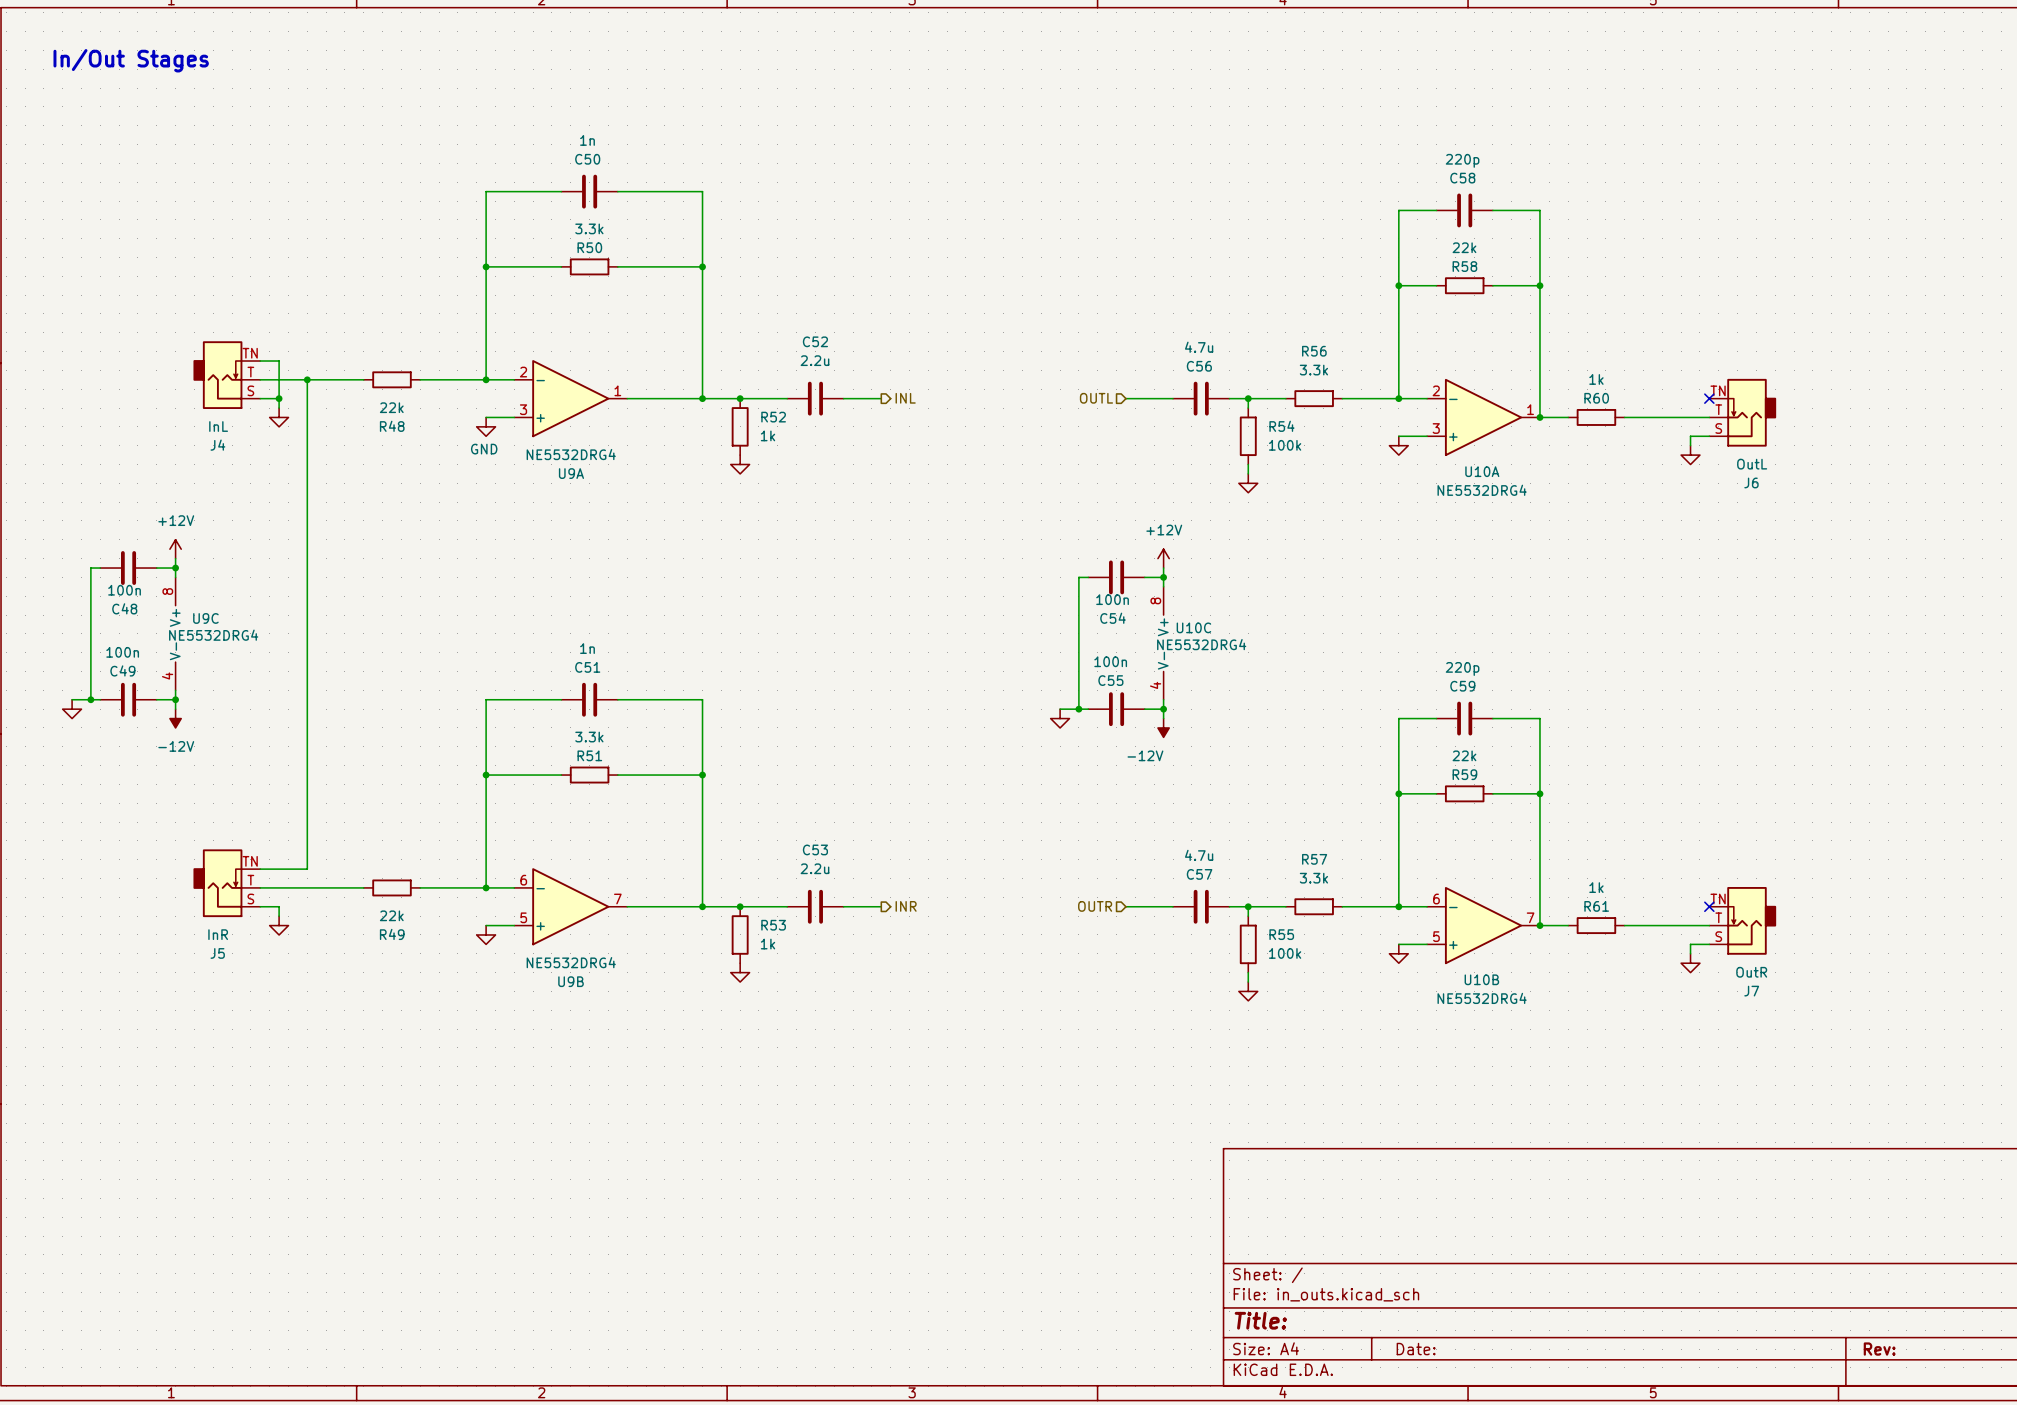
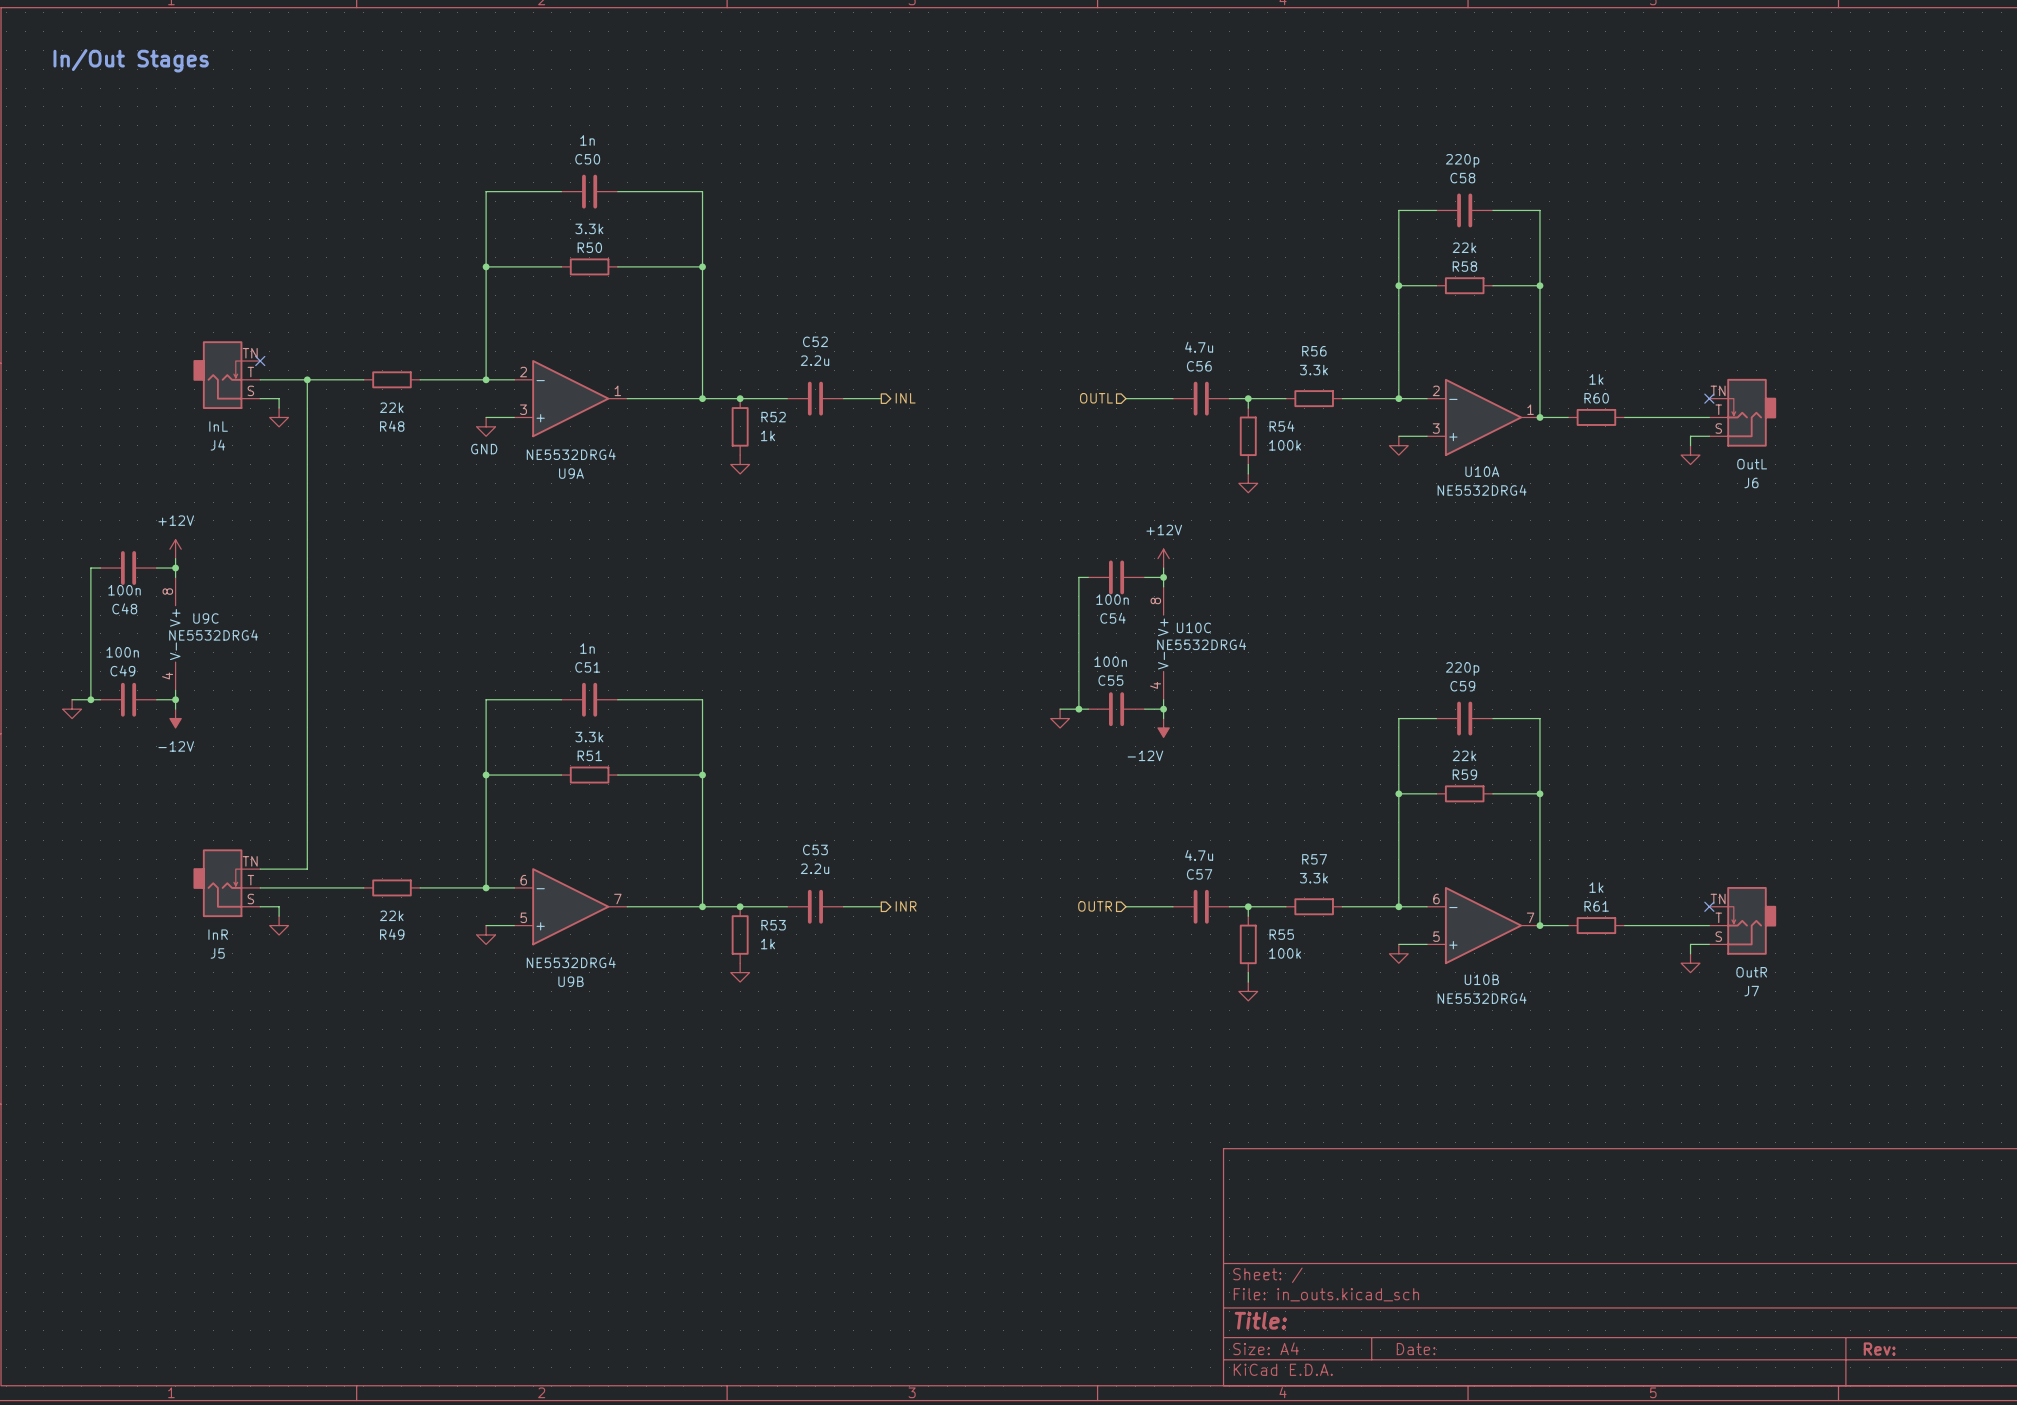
wire: (260, 361) (279, 361) (279, 398) -> none
no-connect mark: none -> (260, 361)
junction: (279, 398) -> none

